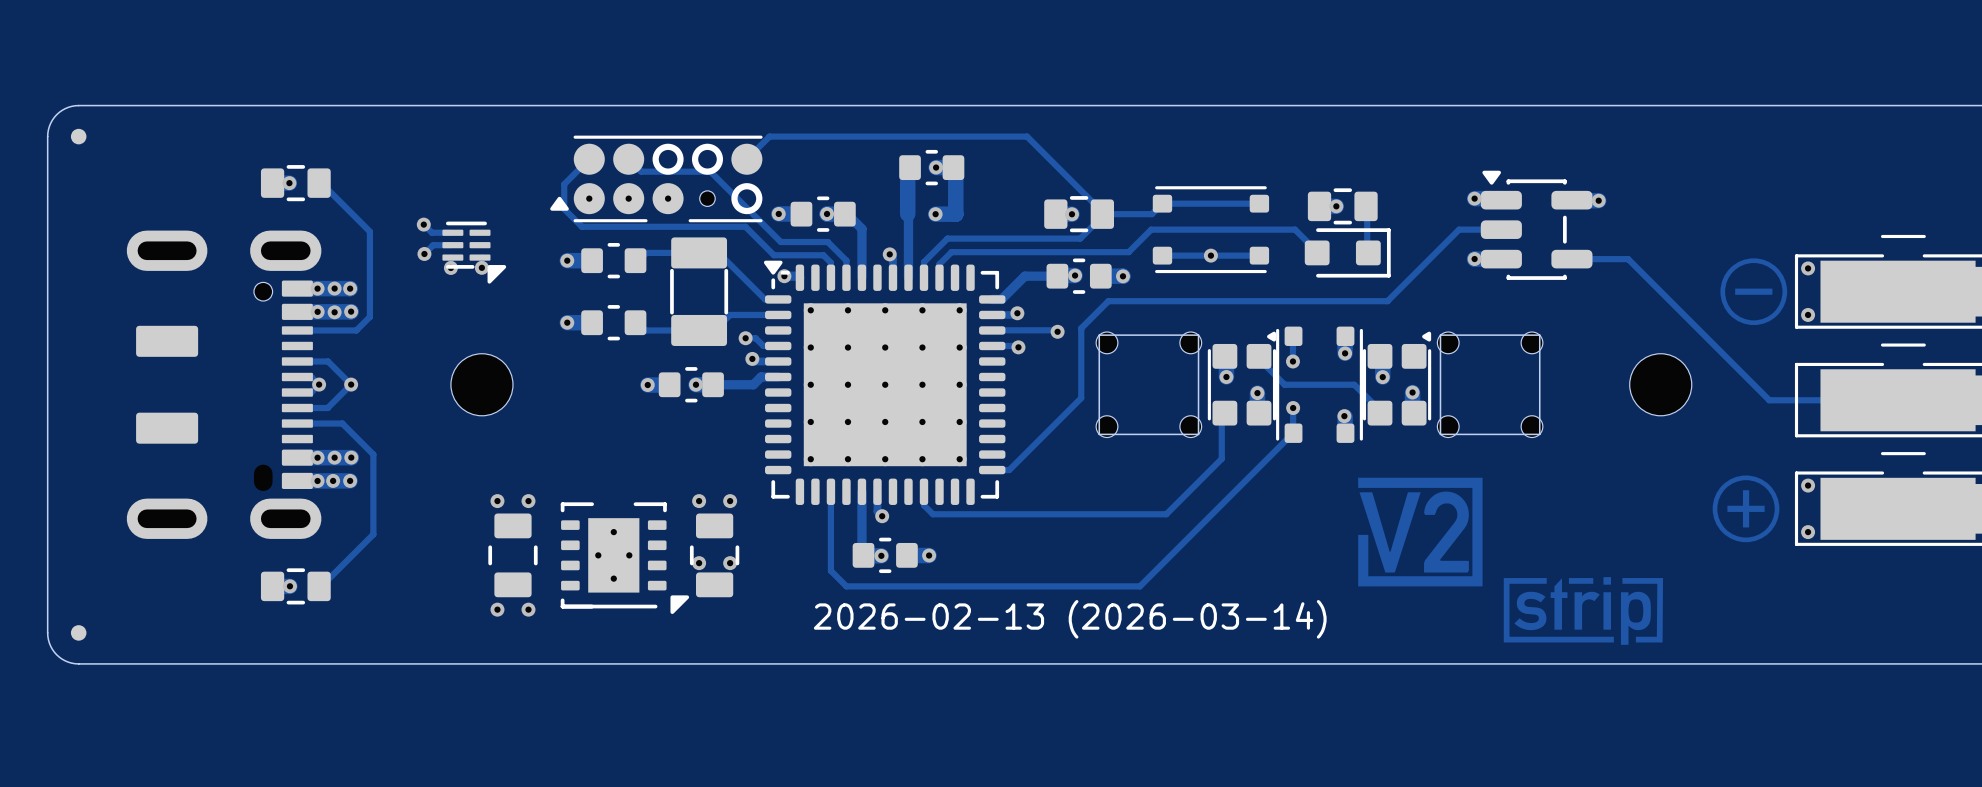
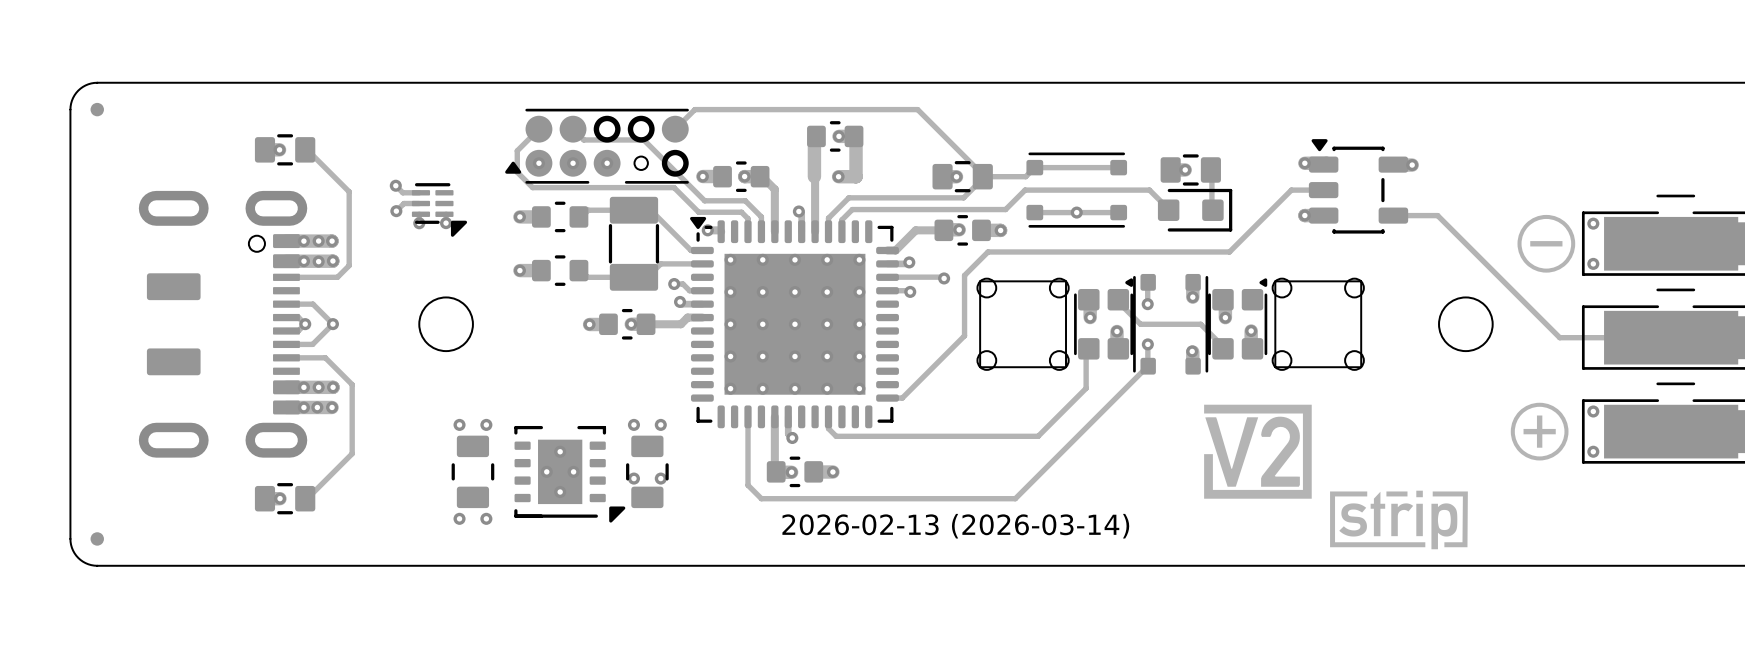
part footprint: [1480, 170, 1593, 280] -> [1308, 139, 1409, 234]

